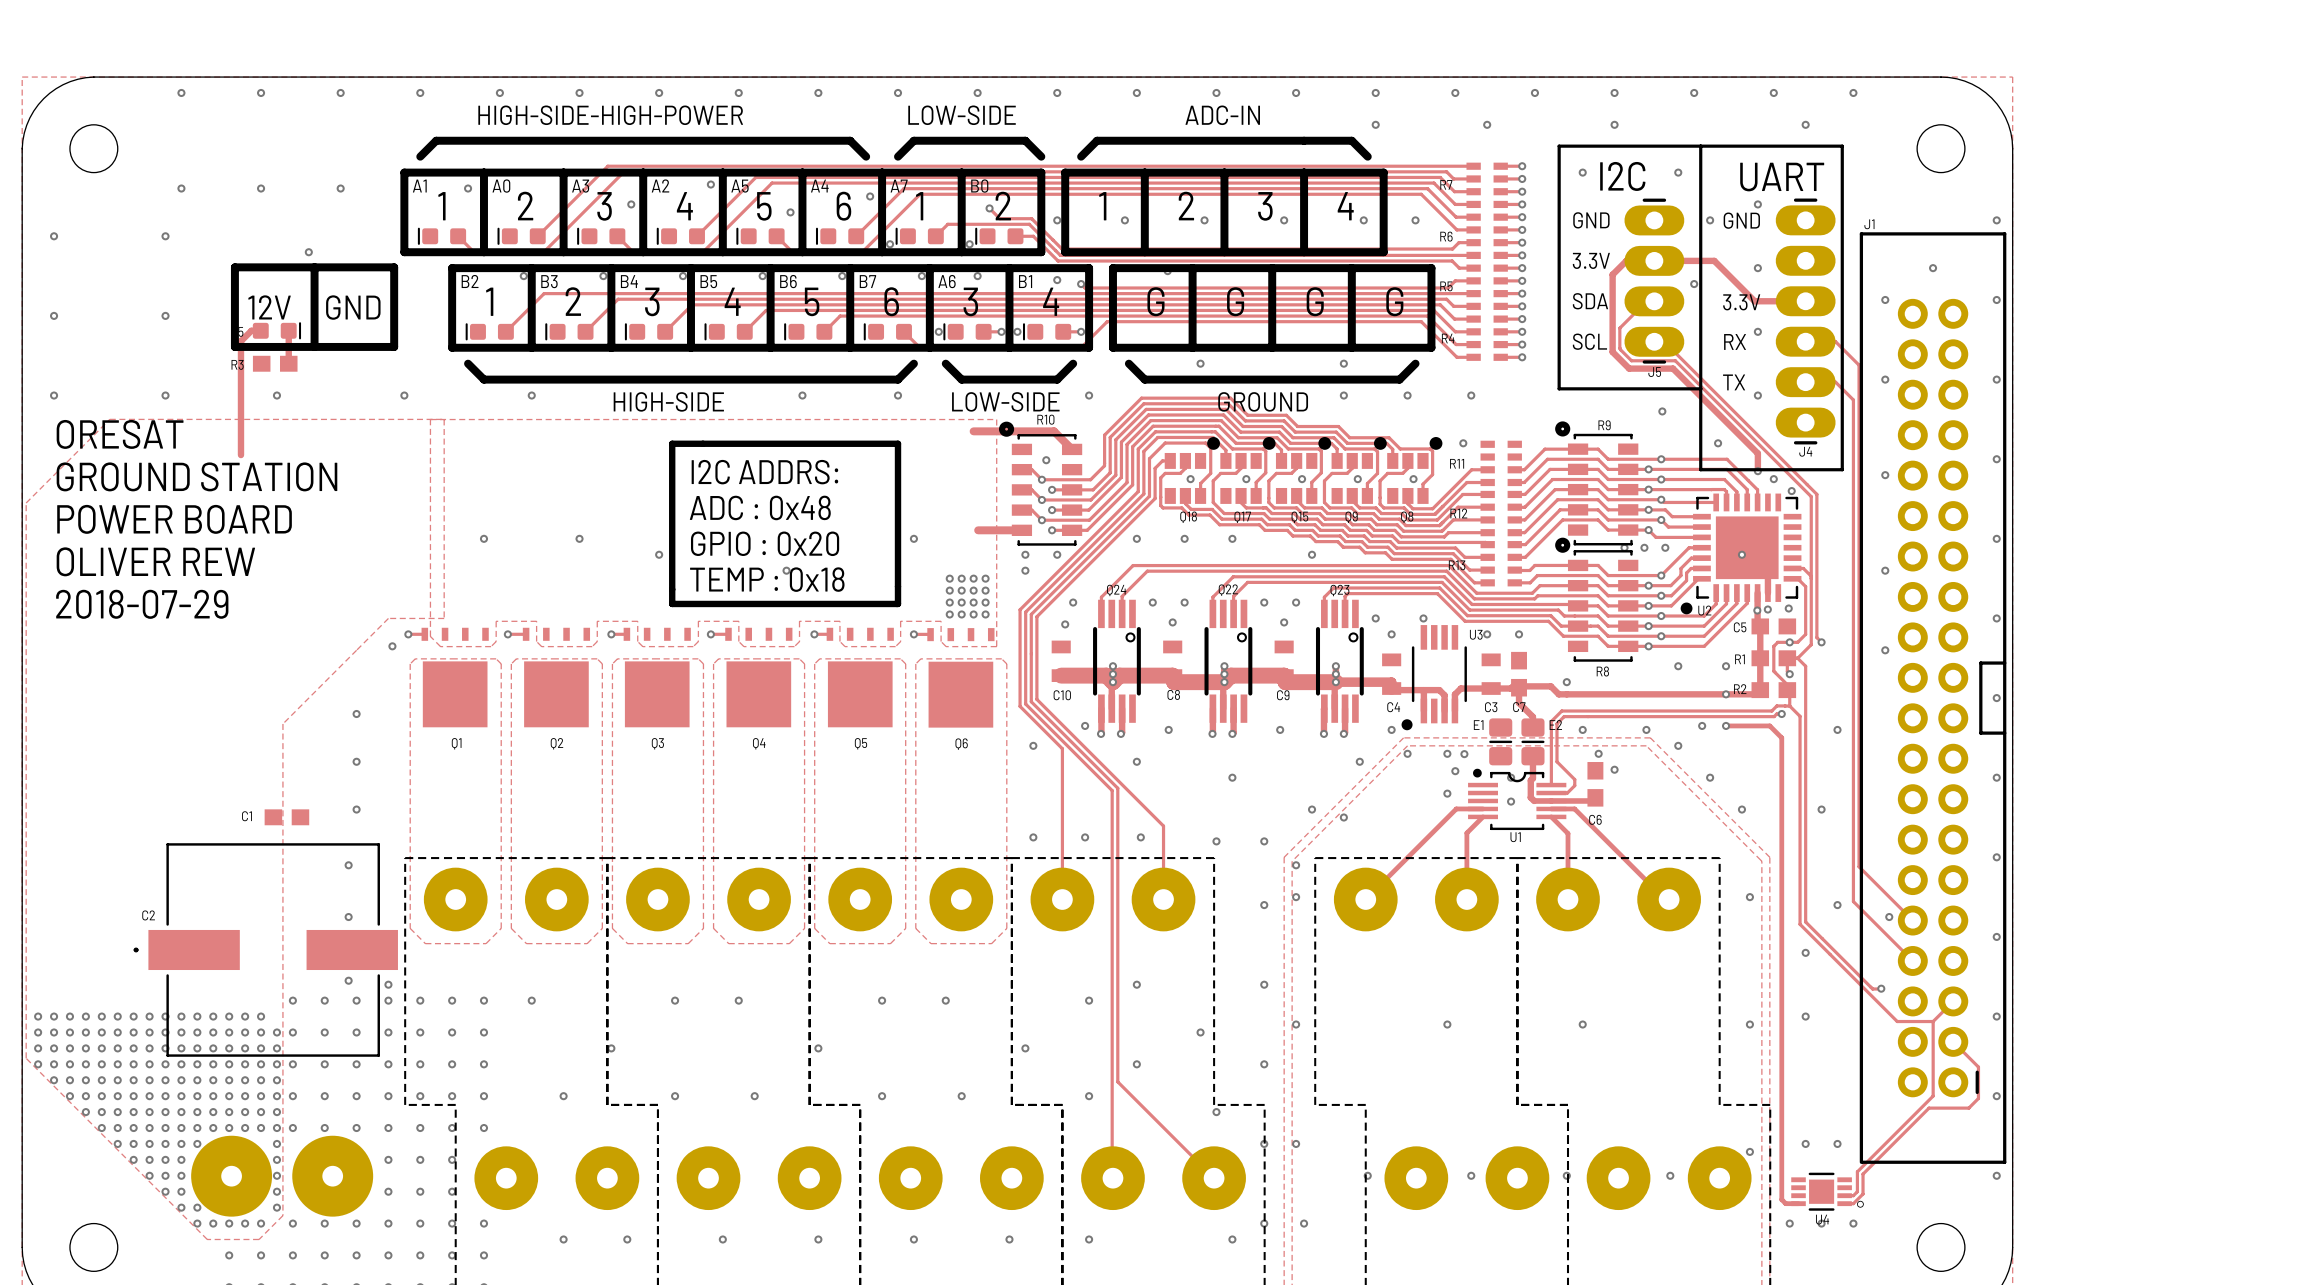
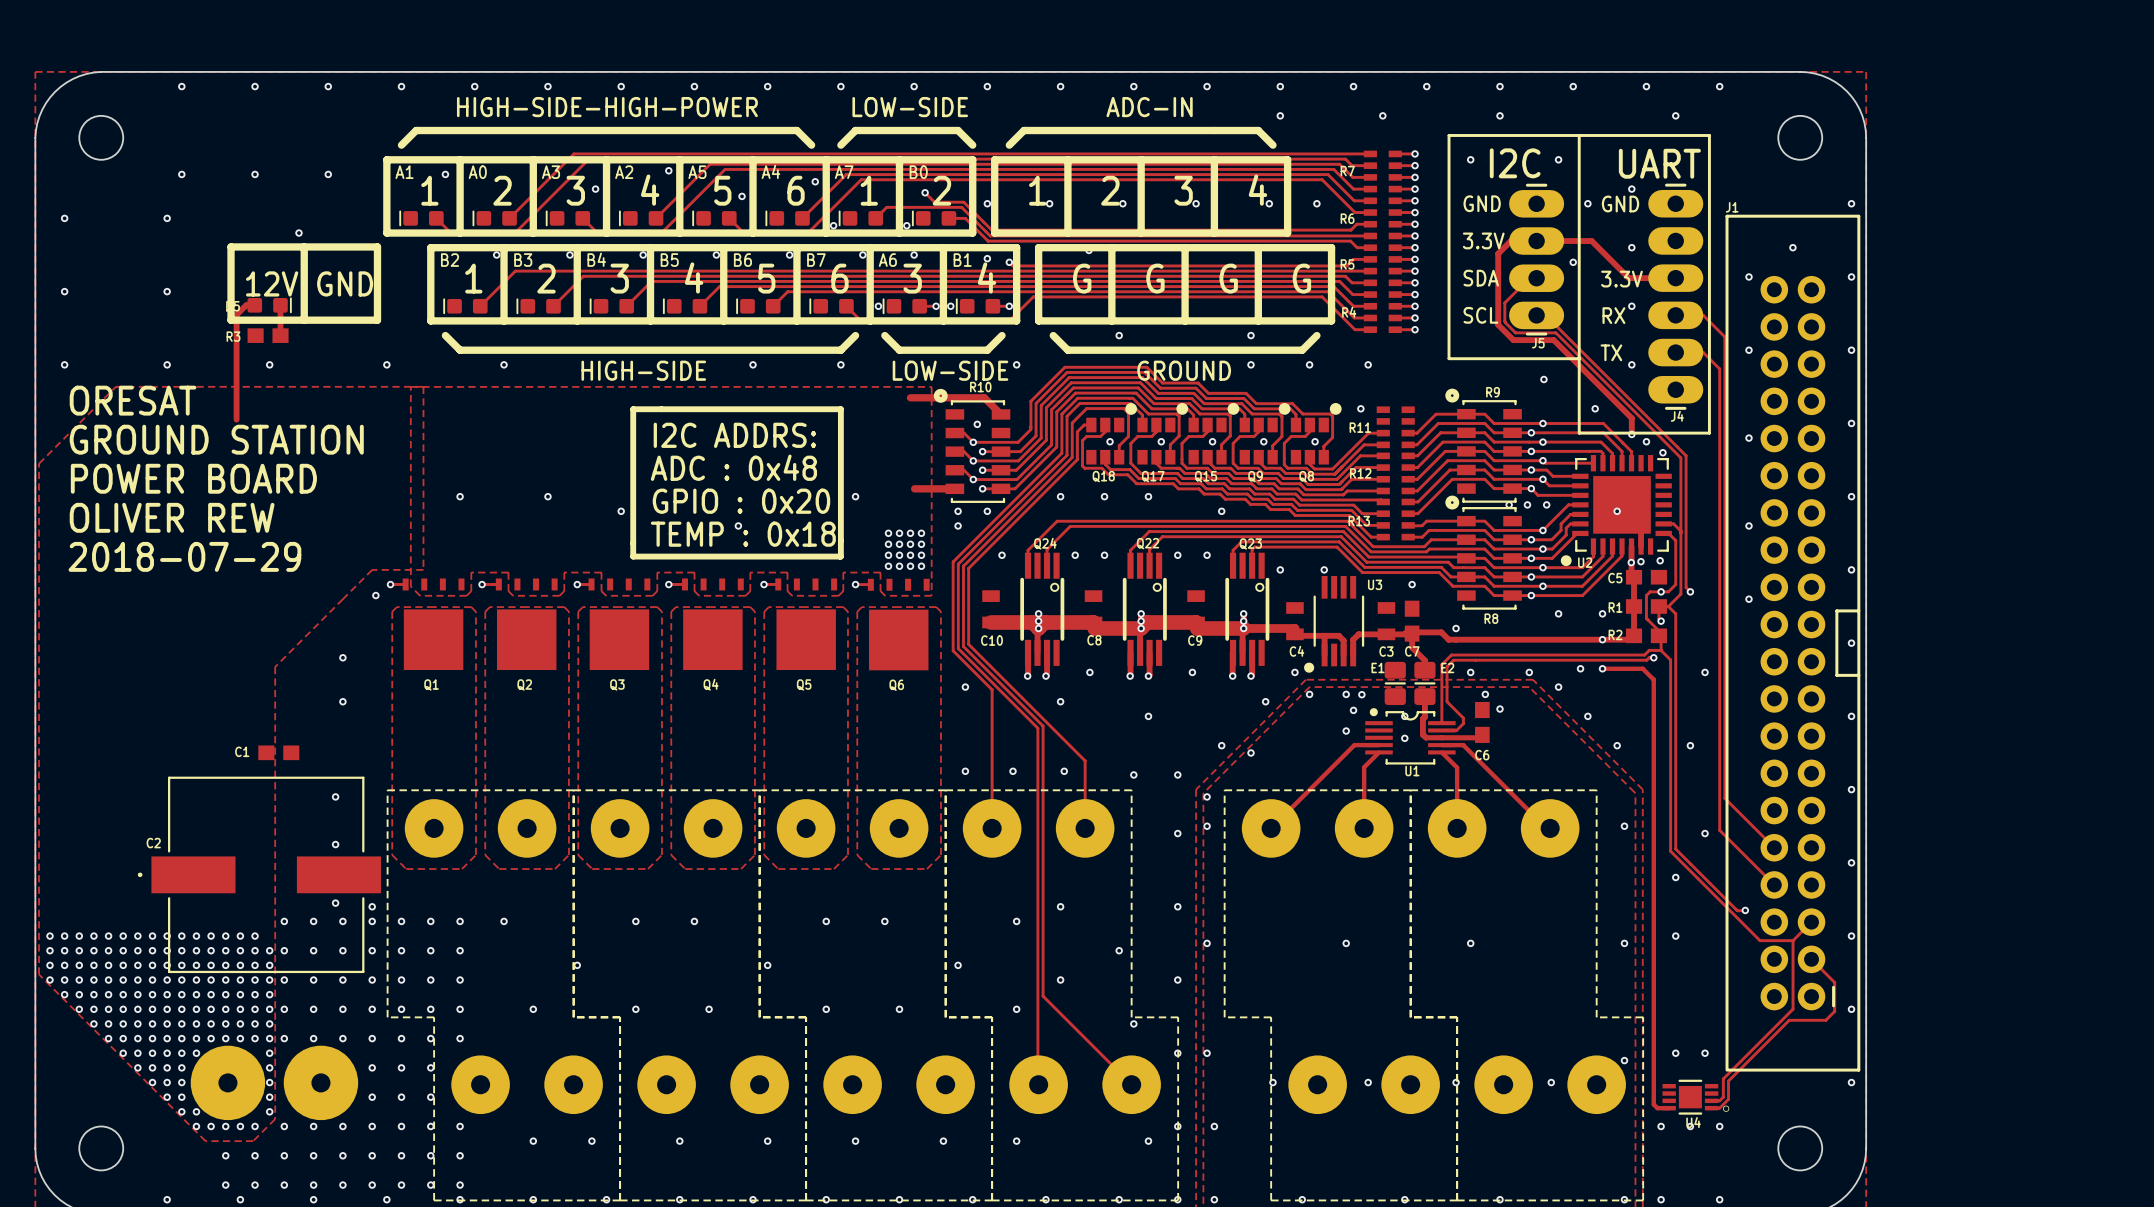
via: (1172, 622) -> none
via: (1284, 622) -> none
via: (1065, 624) -> none
via: (1391, 634) -> none
via: (1487, 634) -> none
via: (1085, 725) -> none
via: (356, 809) -> none
via: (1889, 917) -> none

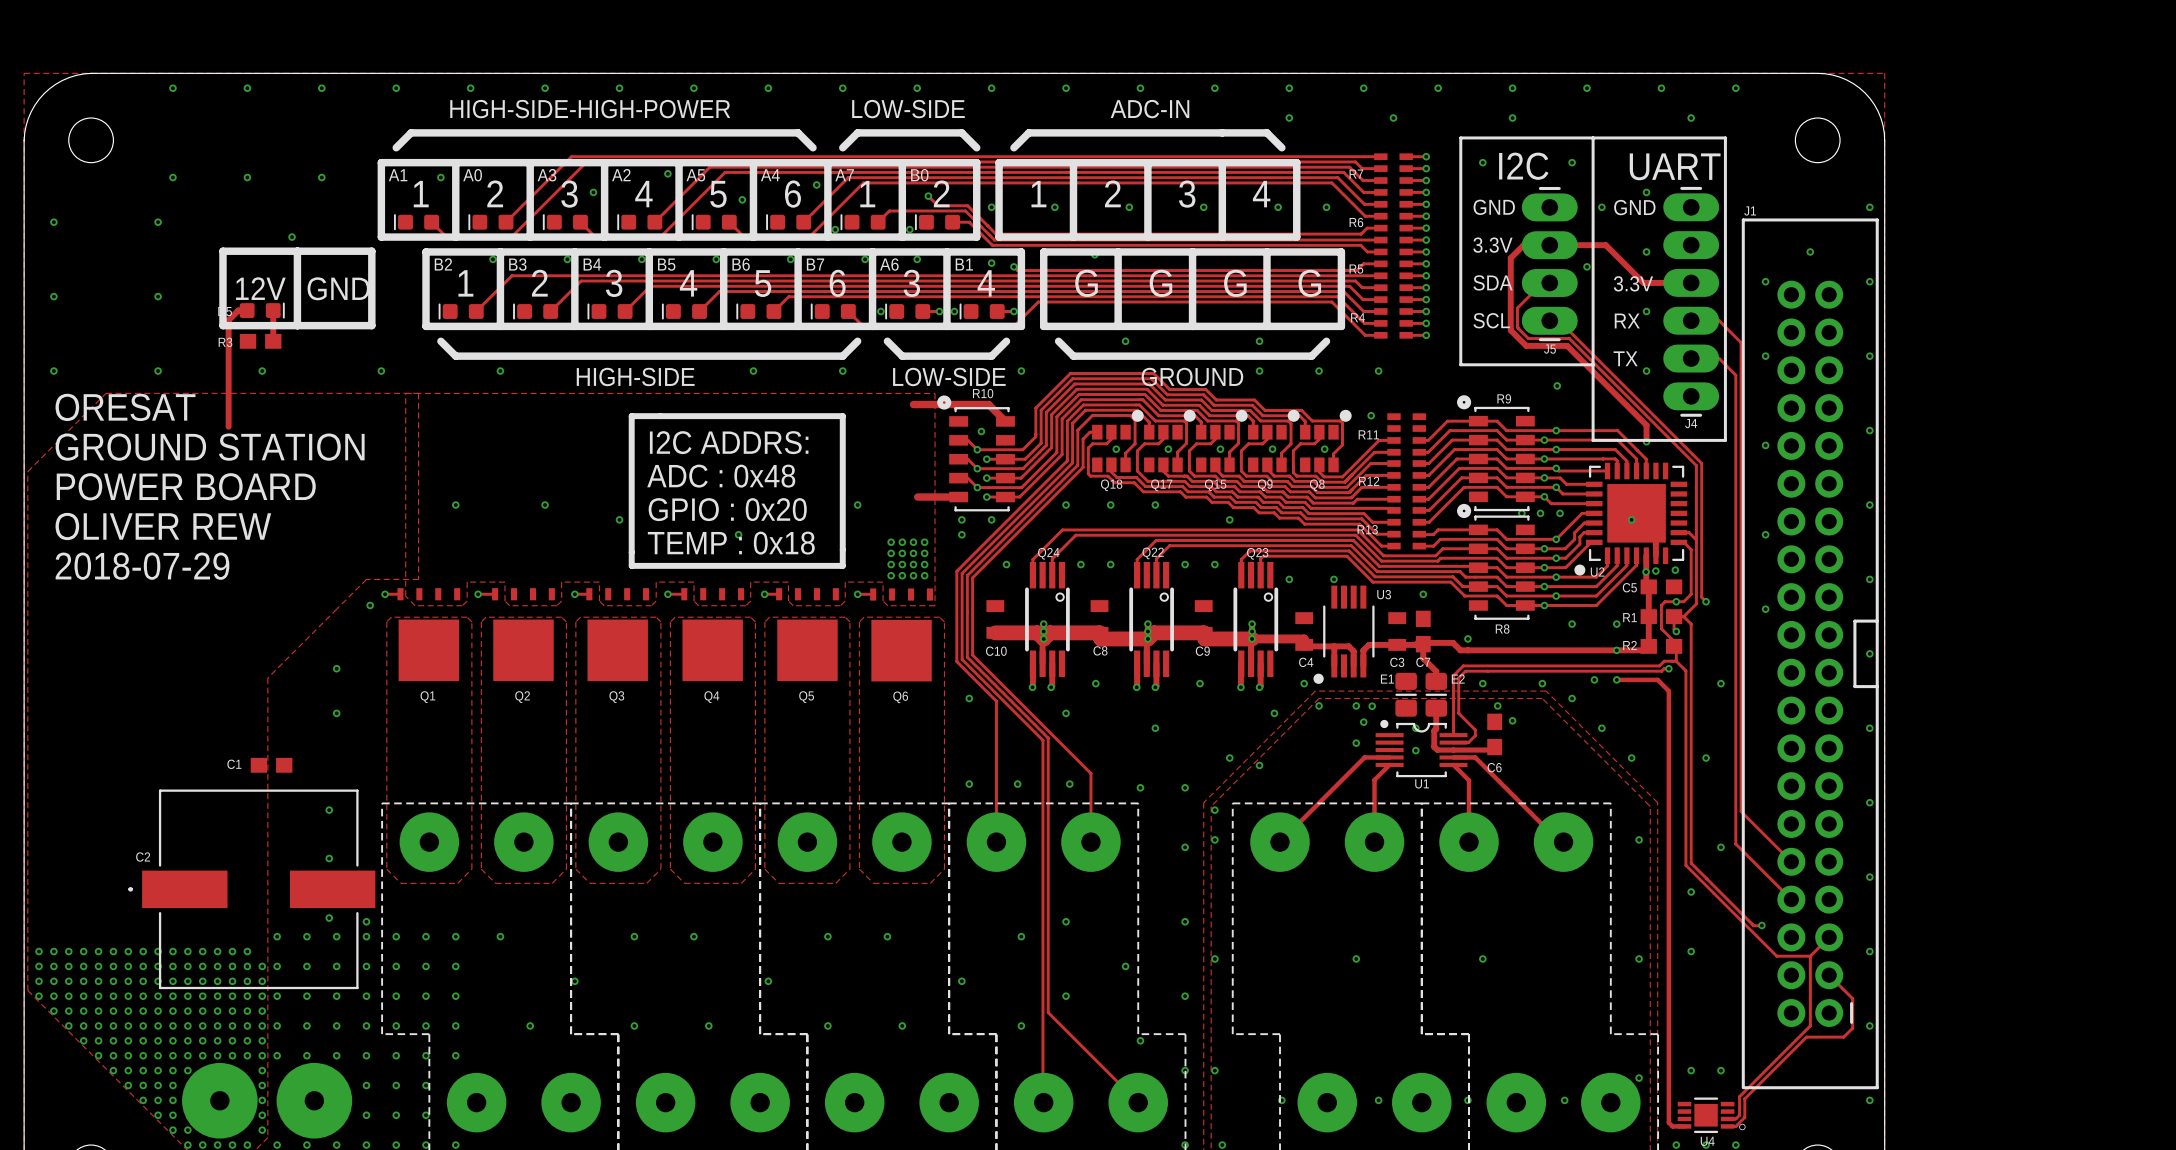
via: (1595, 408) -> none
via: (1646, 441) -> none
via: (1662, 452) -> none

